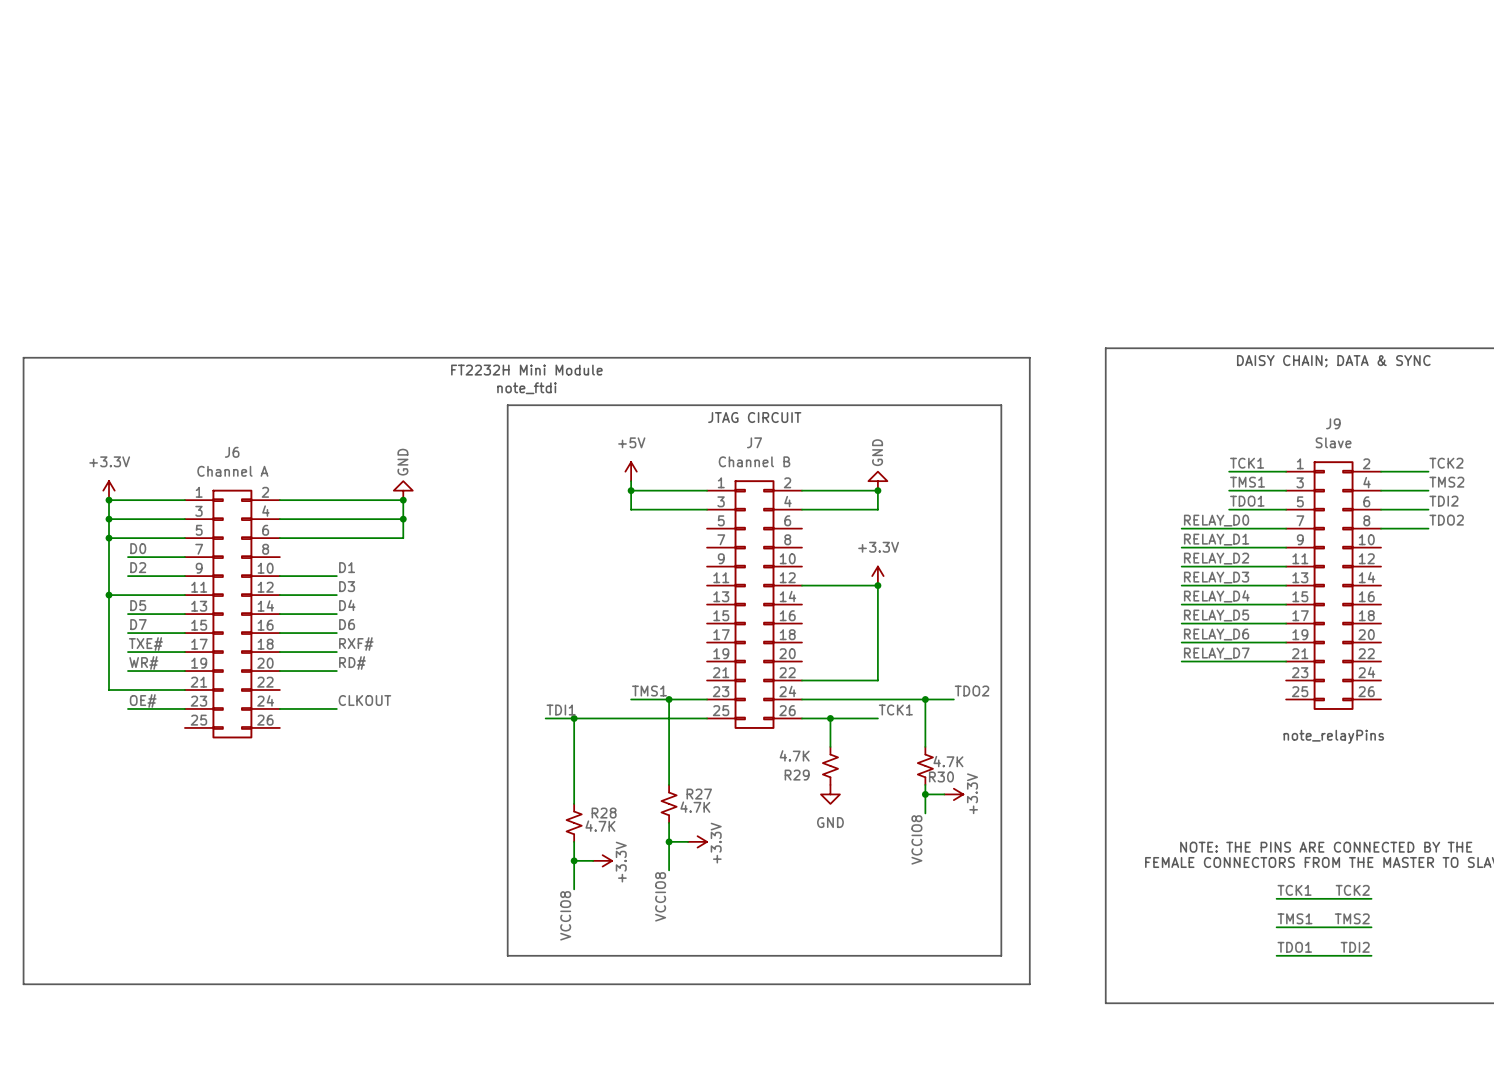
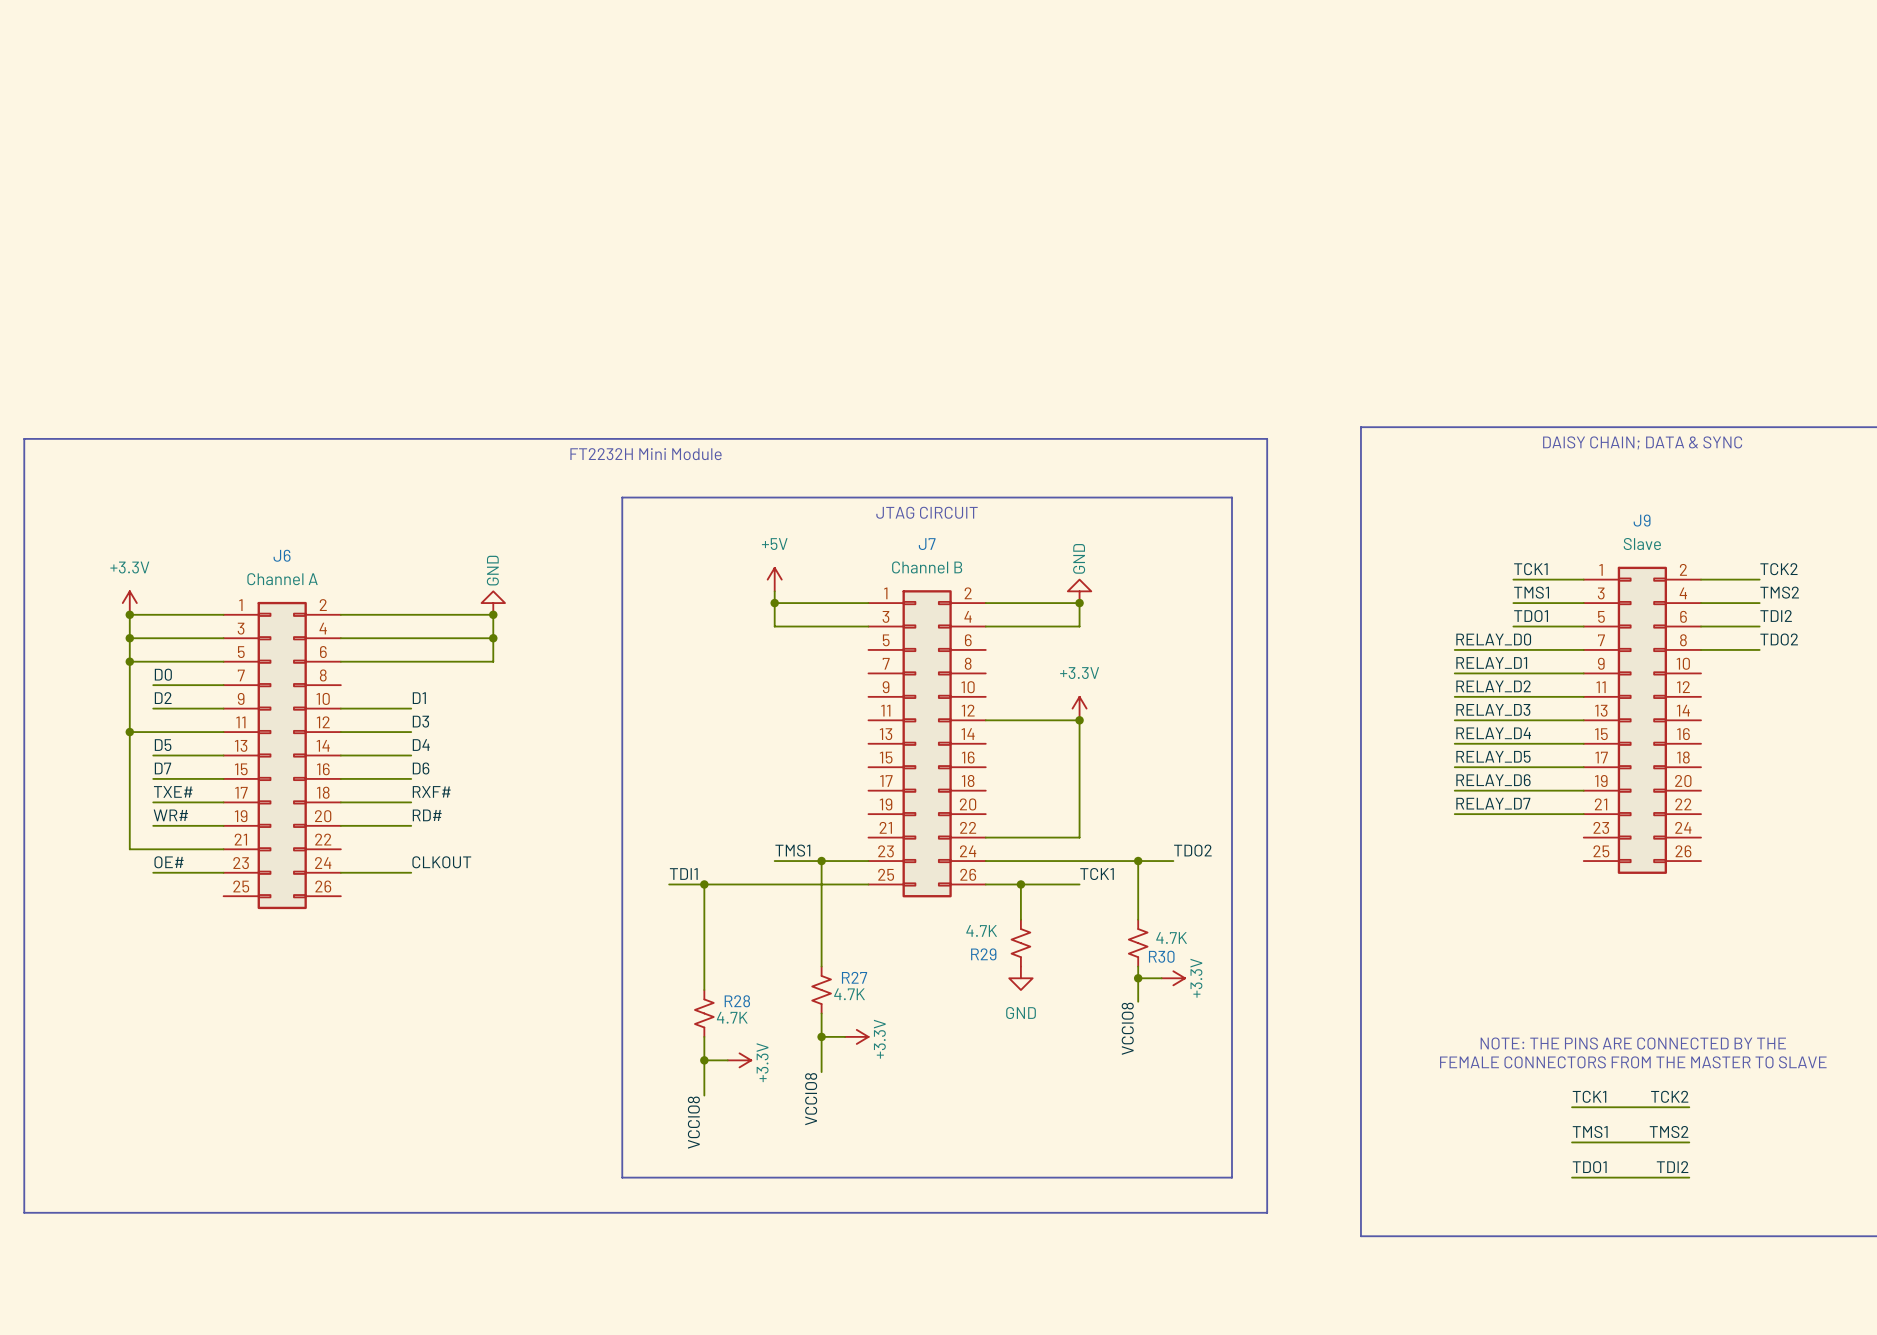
text: note_ftdi (526, 388) -> none
text: note_relayPins (1333, 736) -> none

